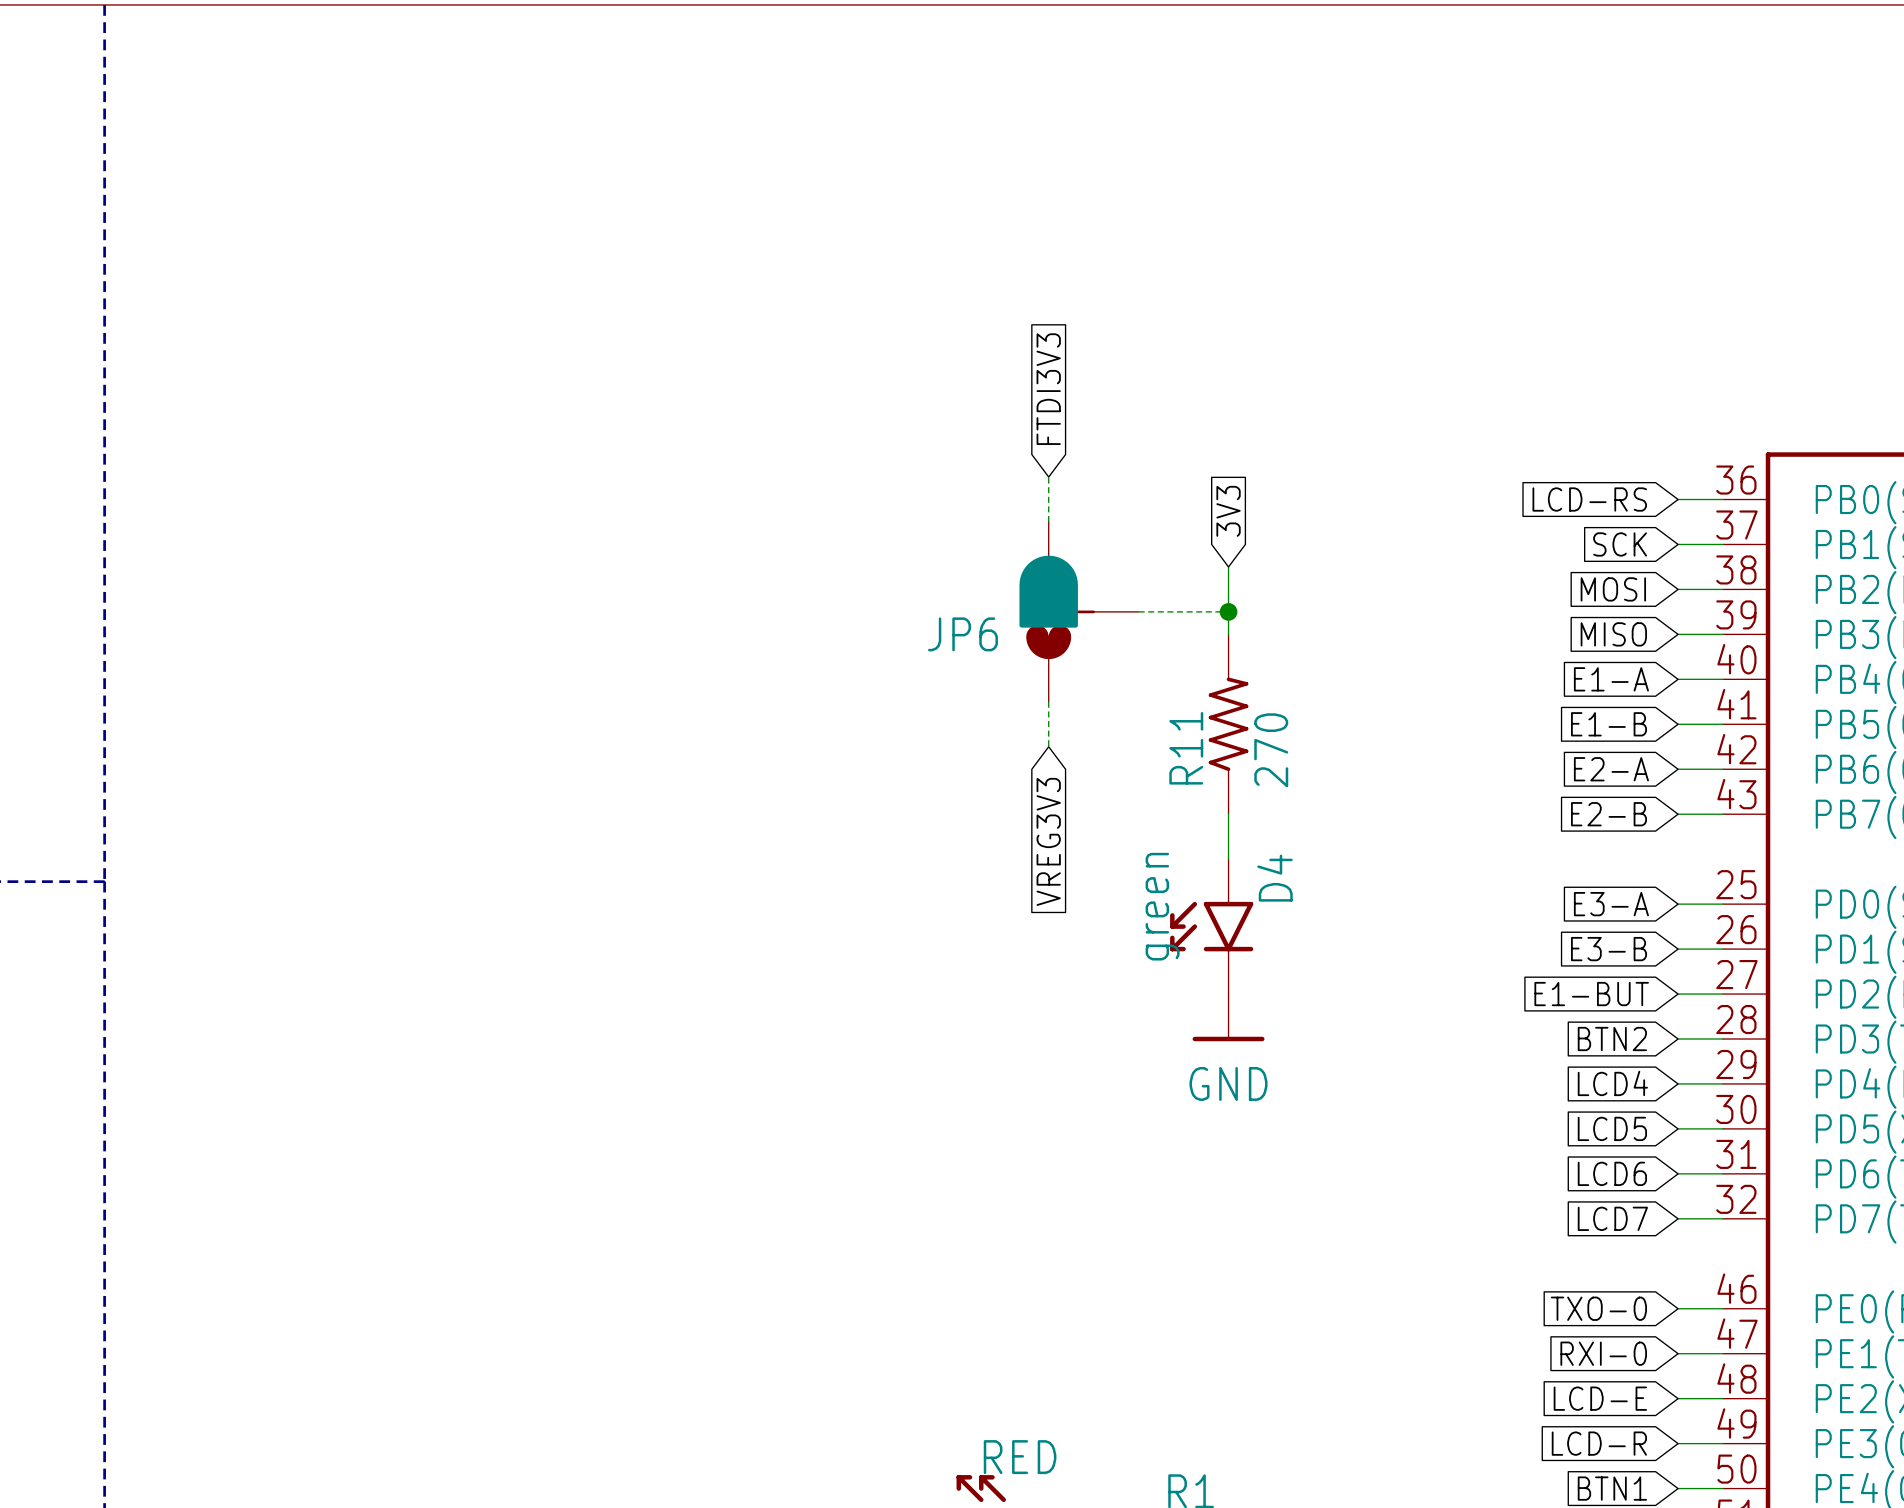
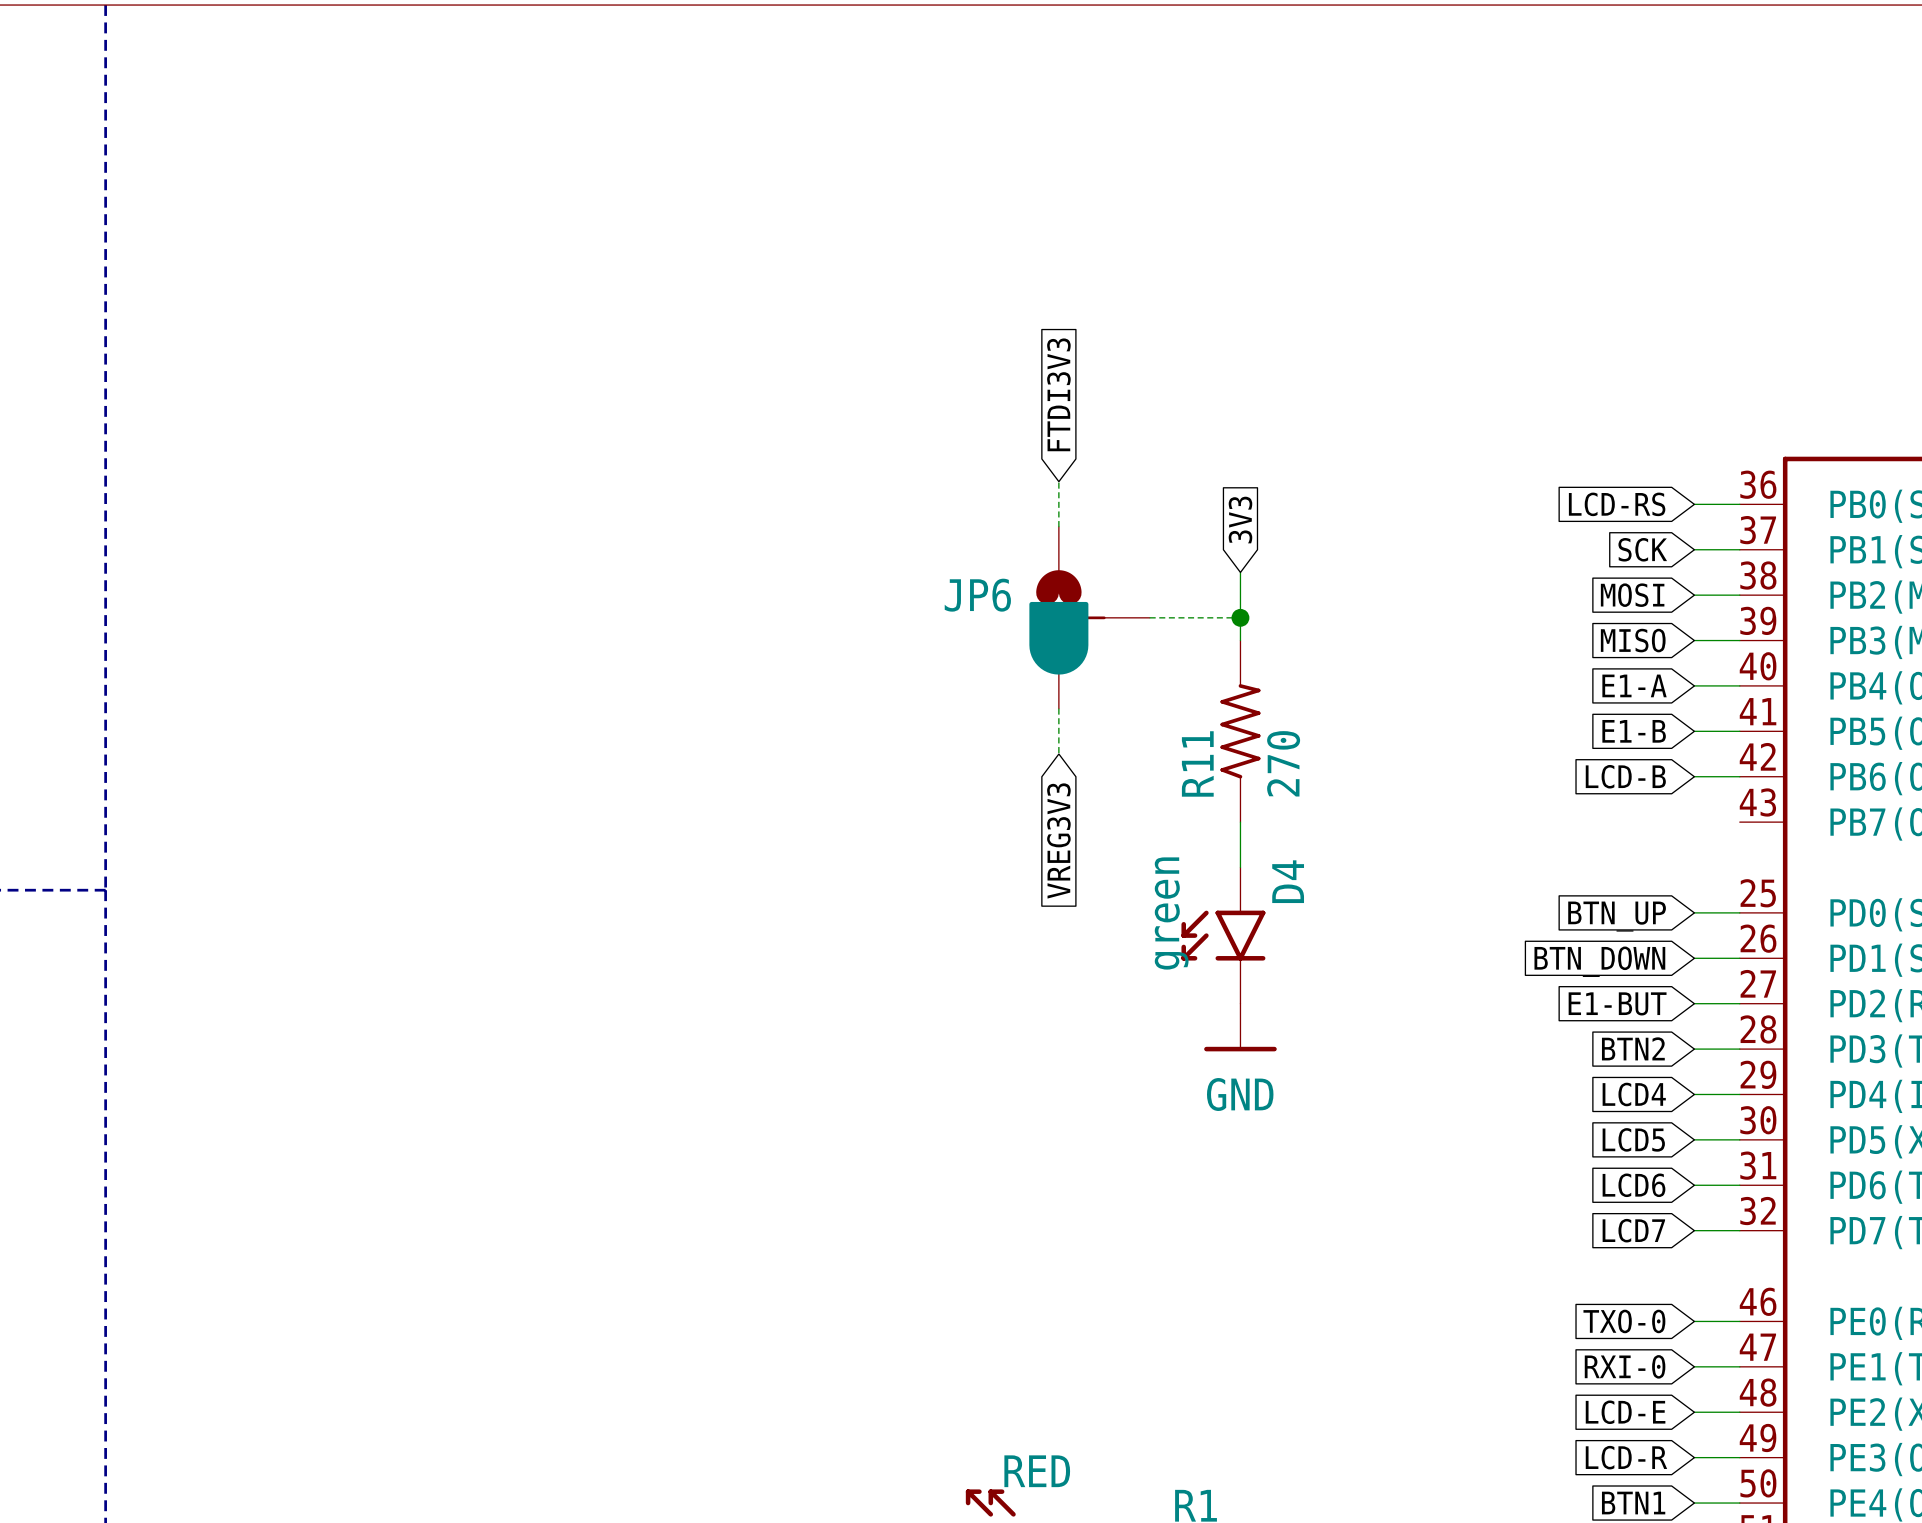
JP6 flip: as is (1057, 607) -> up-down (1067, 622)
global label: E2-A (1611, 769) -> LCD-B (1625, 776)
global label: E2-B (1609, 814) -> none
wire: (1678, 814) (1723, 814) -> none
global label: E3-A (1611, 904) -> BTN_UP (1617, 916)
global label: E3-B (1609, 949) -> BTN_DOWN (1599, 961)

